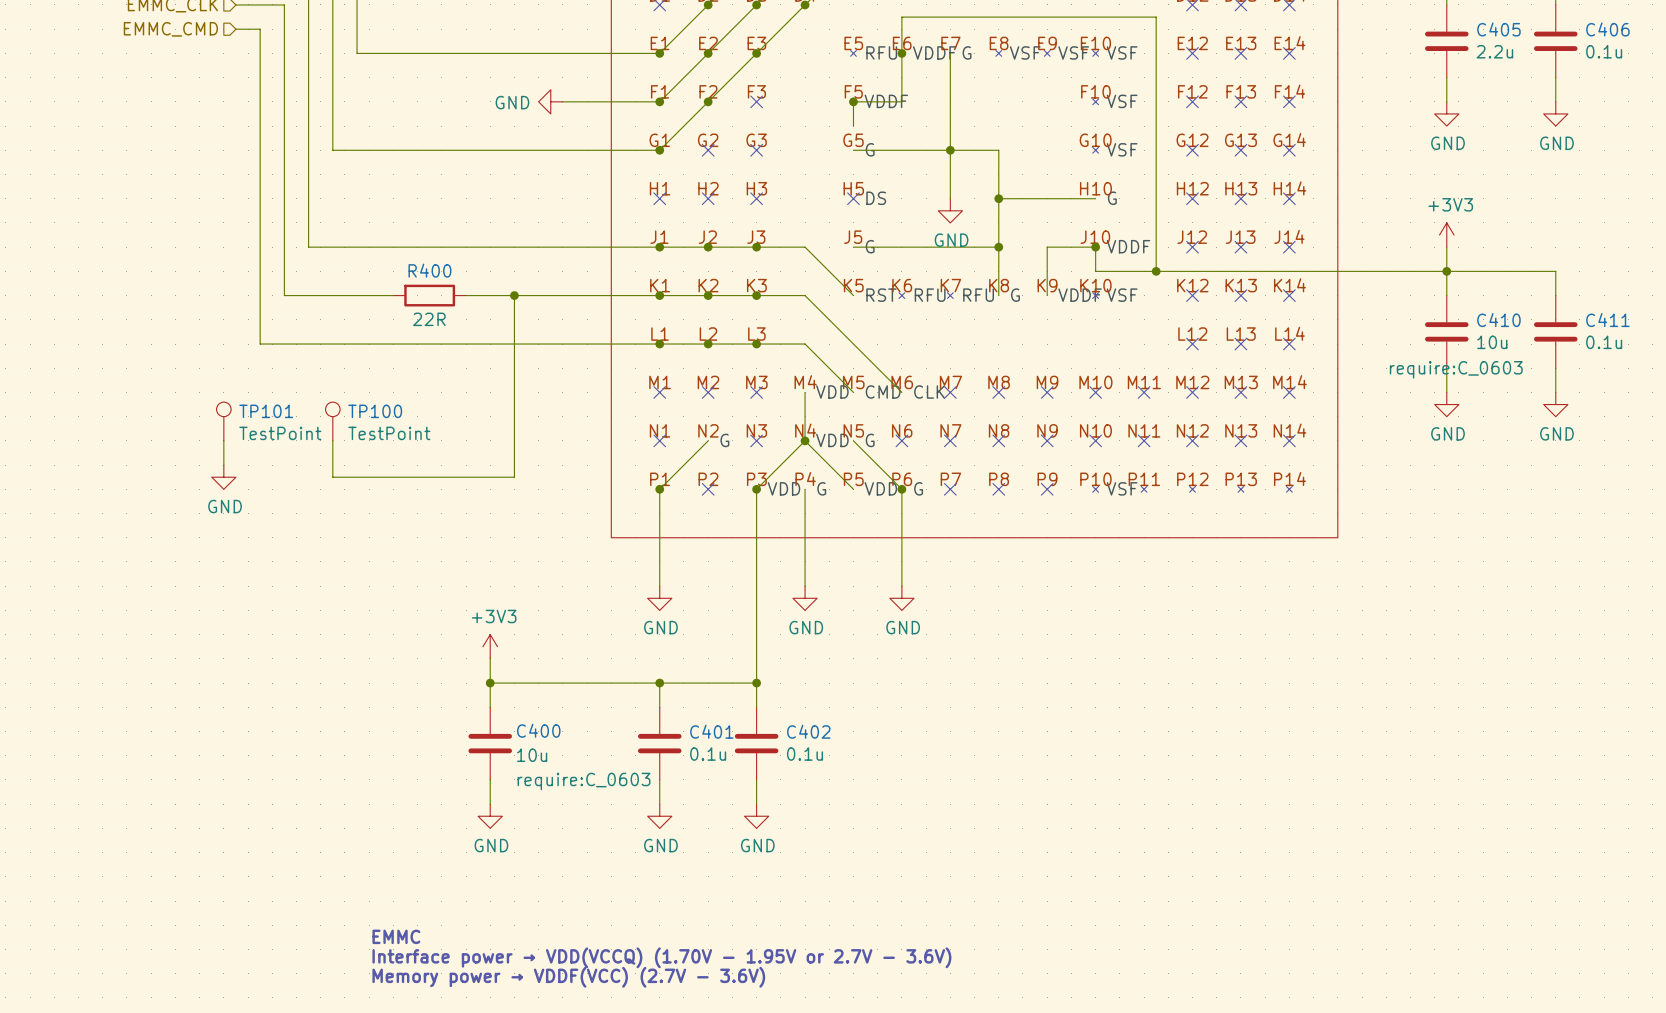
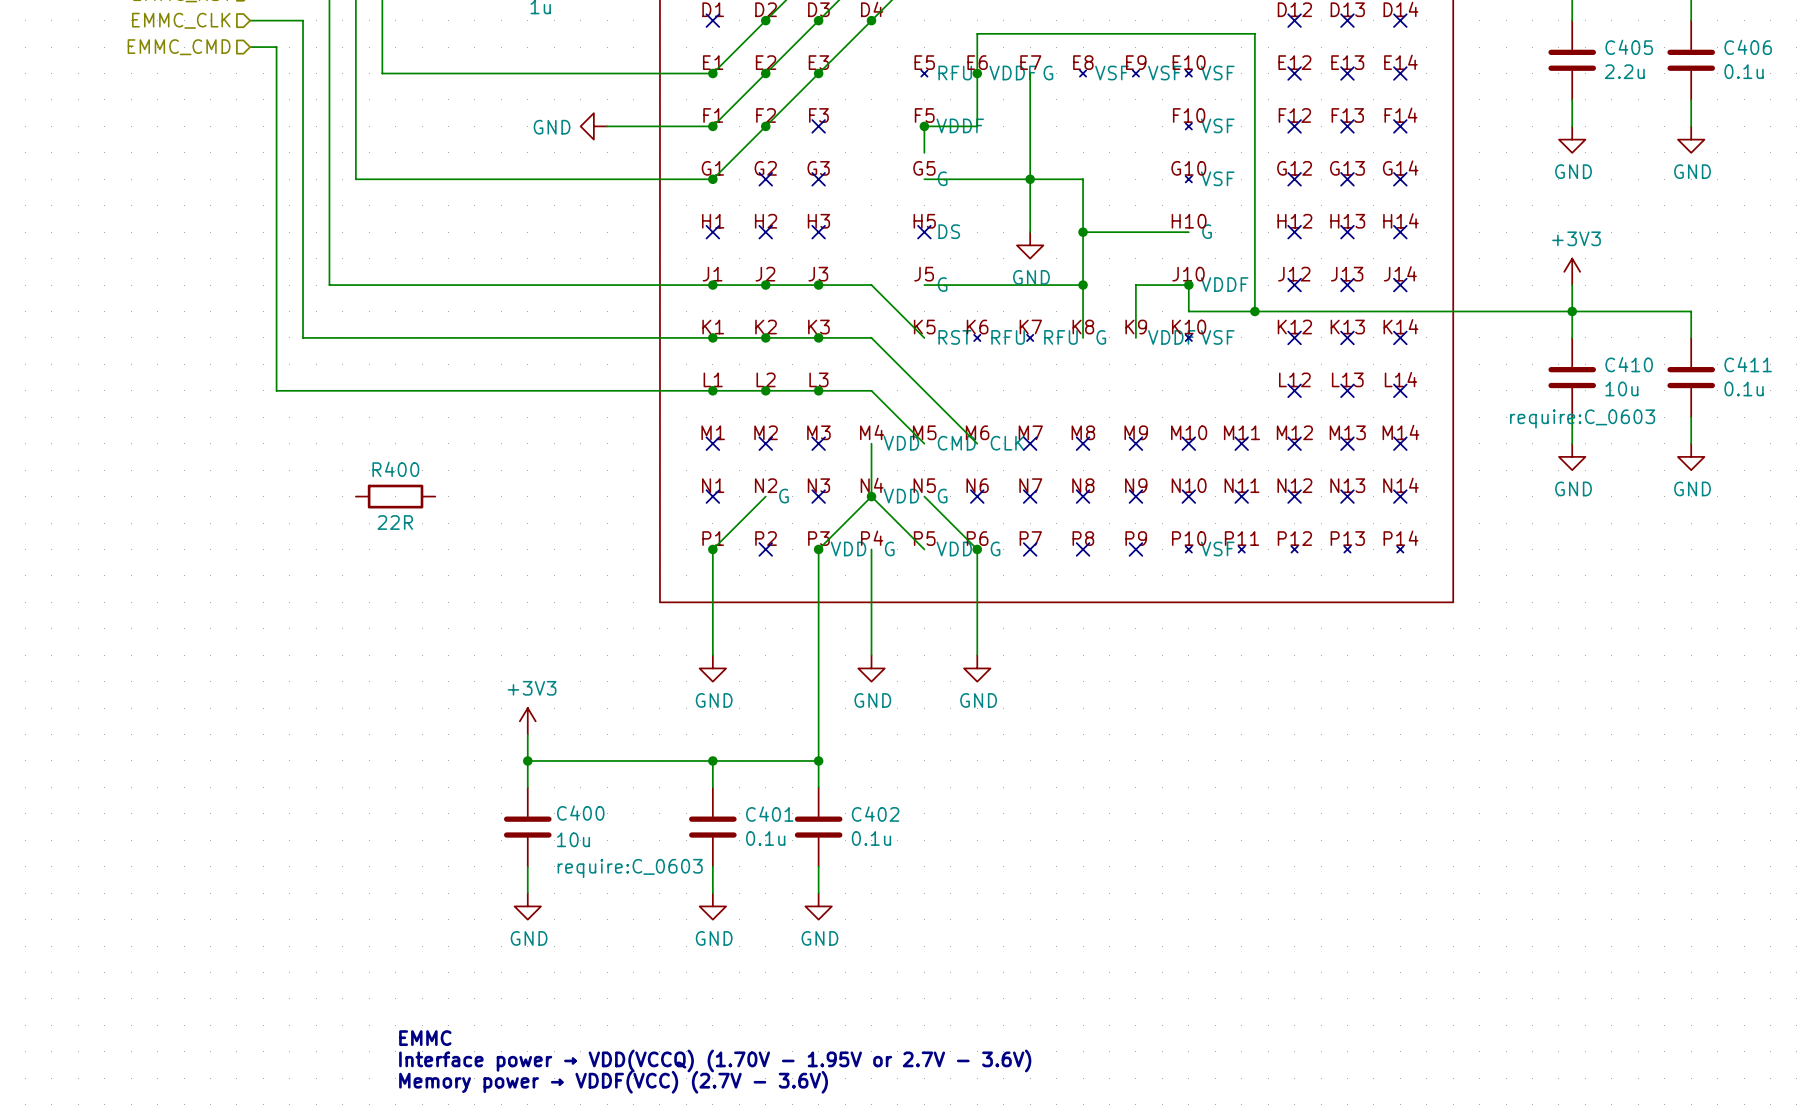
wire: none -> (422, 337) (501, 337)
R400 position: (429, 295) -> (395, 496)
wire: (514, 295) (514, 477) (332, 477) (332, 440) -> none
junction: (514, 295) -> none
TP101: TestPoint (223, 421) -> none
TP100: TestPoint (332, 421) -> none
wire: (223, 440) (223, 465) -> none
power symbol: GND (223, 477) -> none

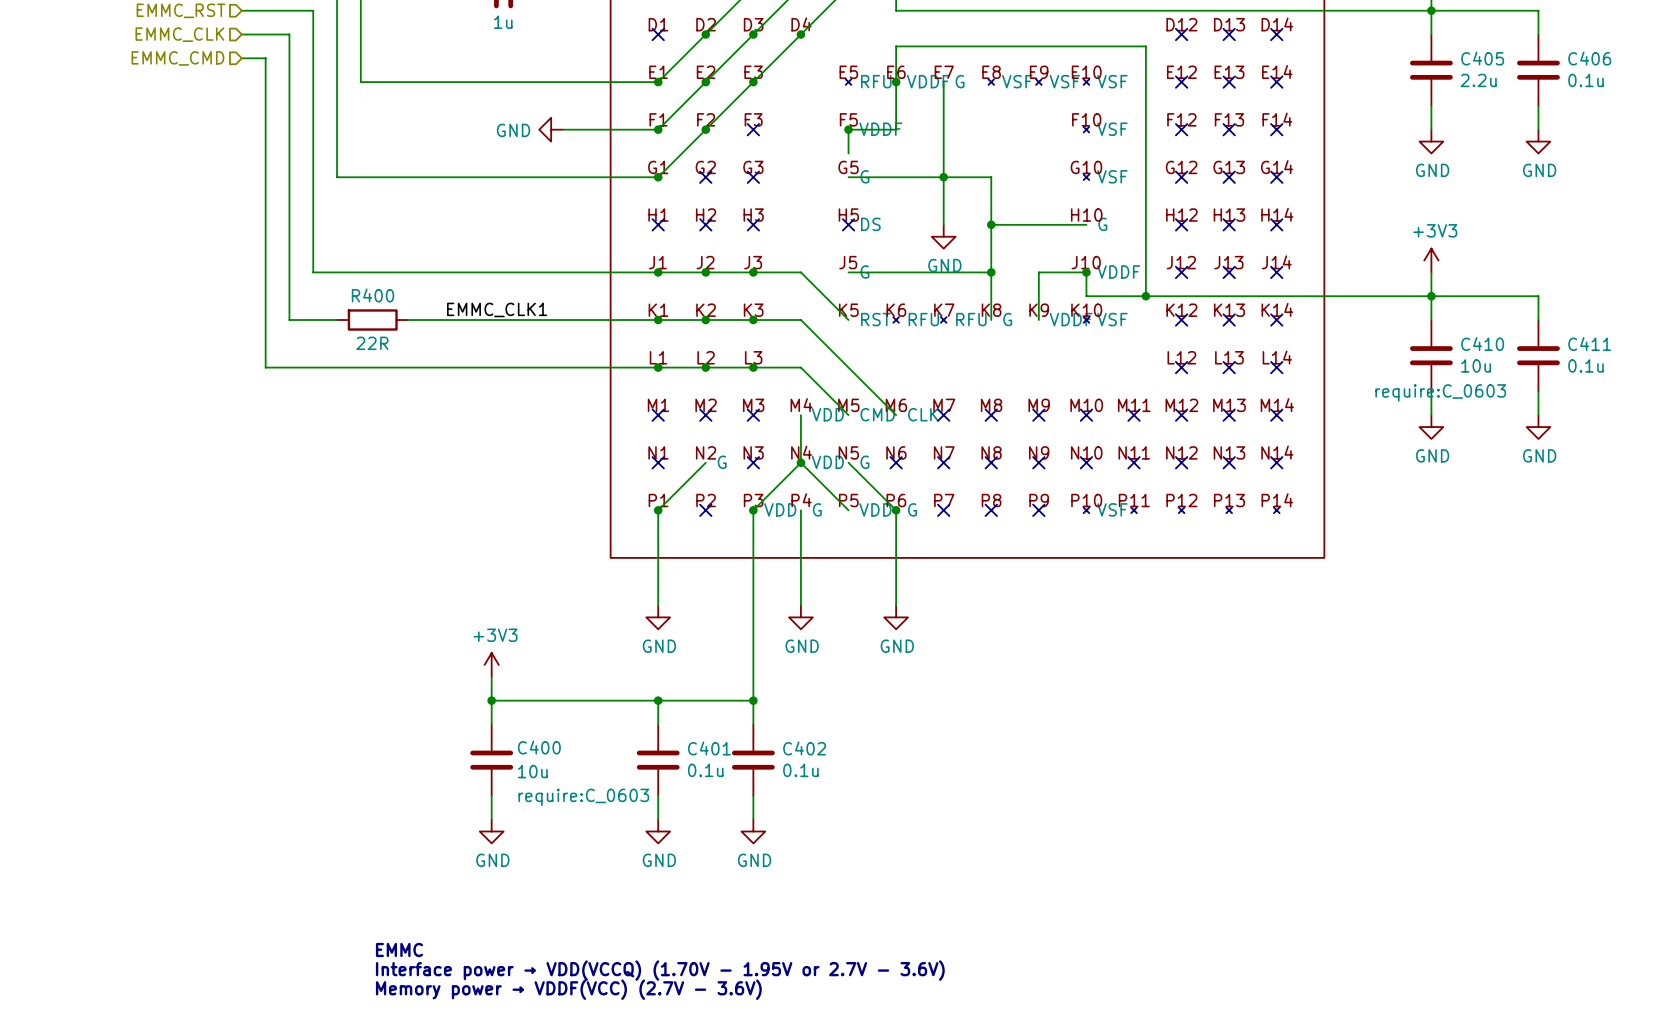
label: none -> EMMC_CLK1 (497, 309)
wire: (355, 337) (435, 337) -> none
R400 position: (395, 496) -> (372, 320)

